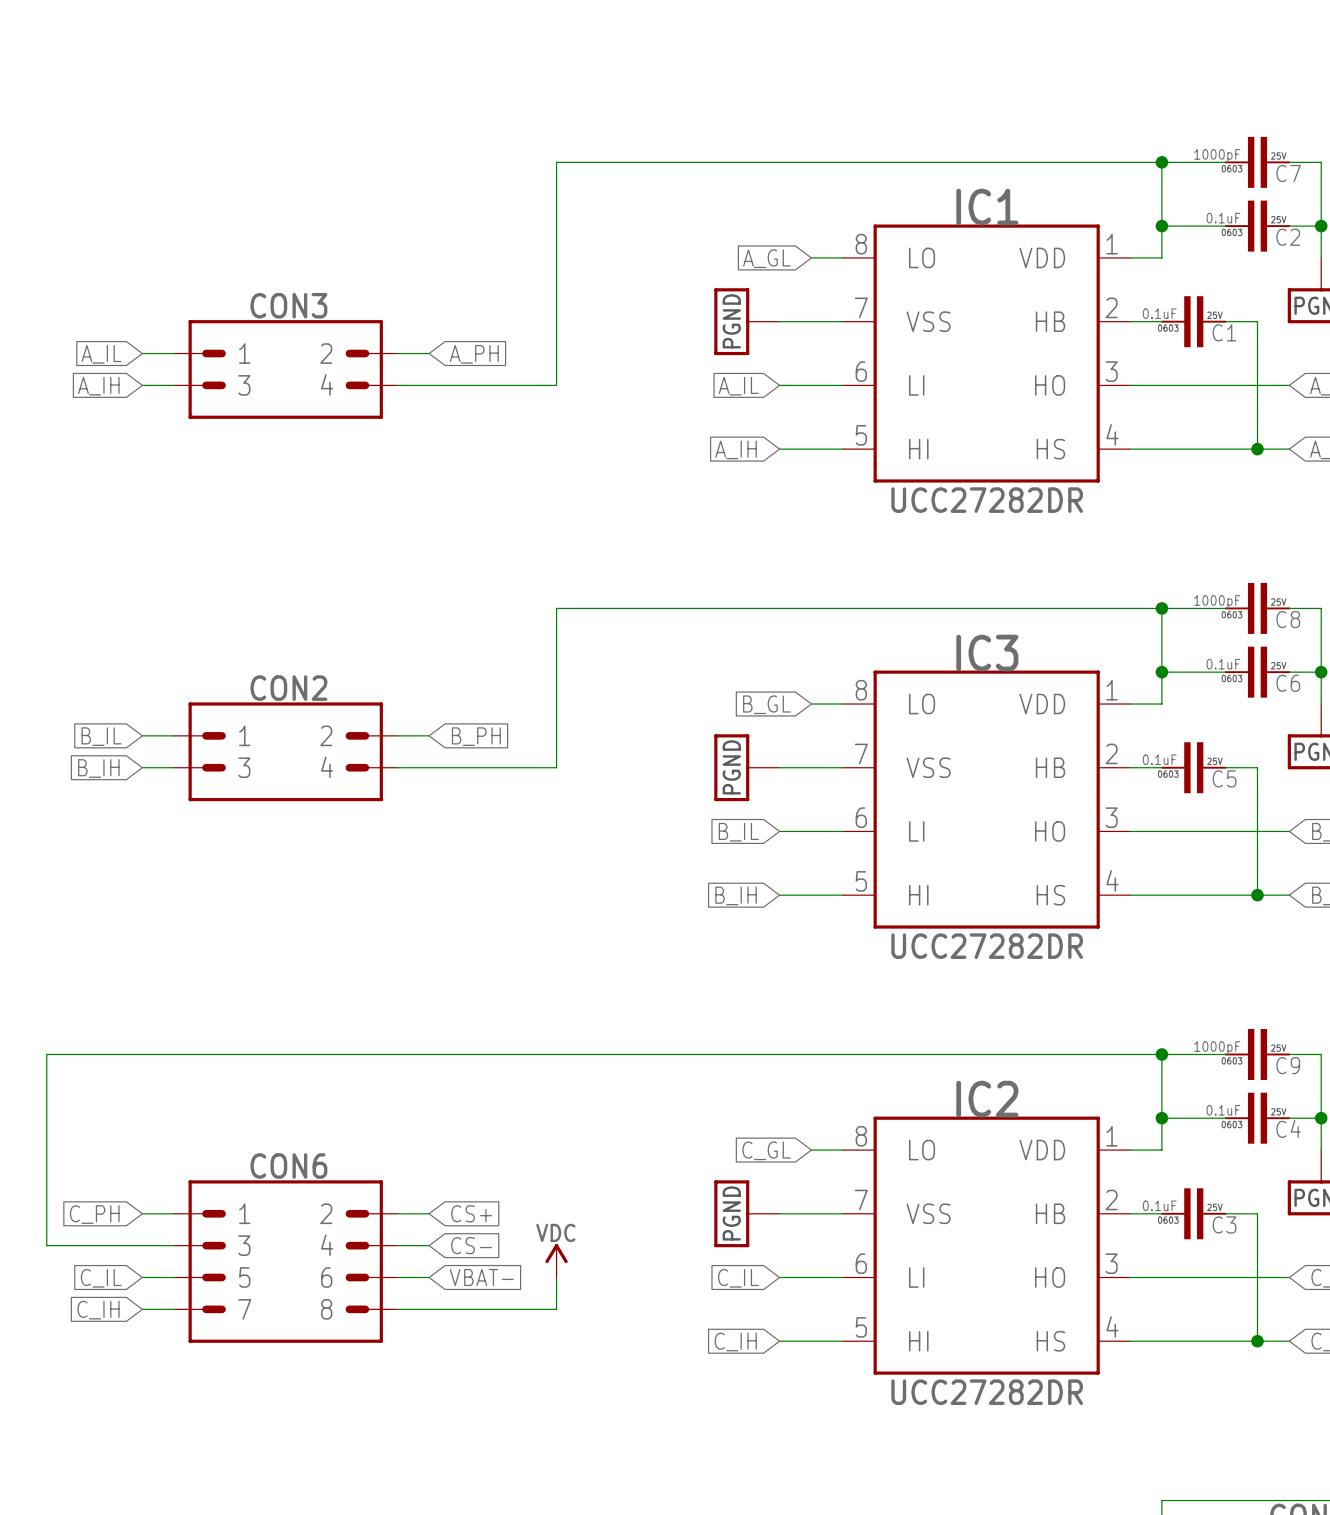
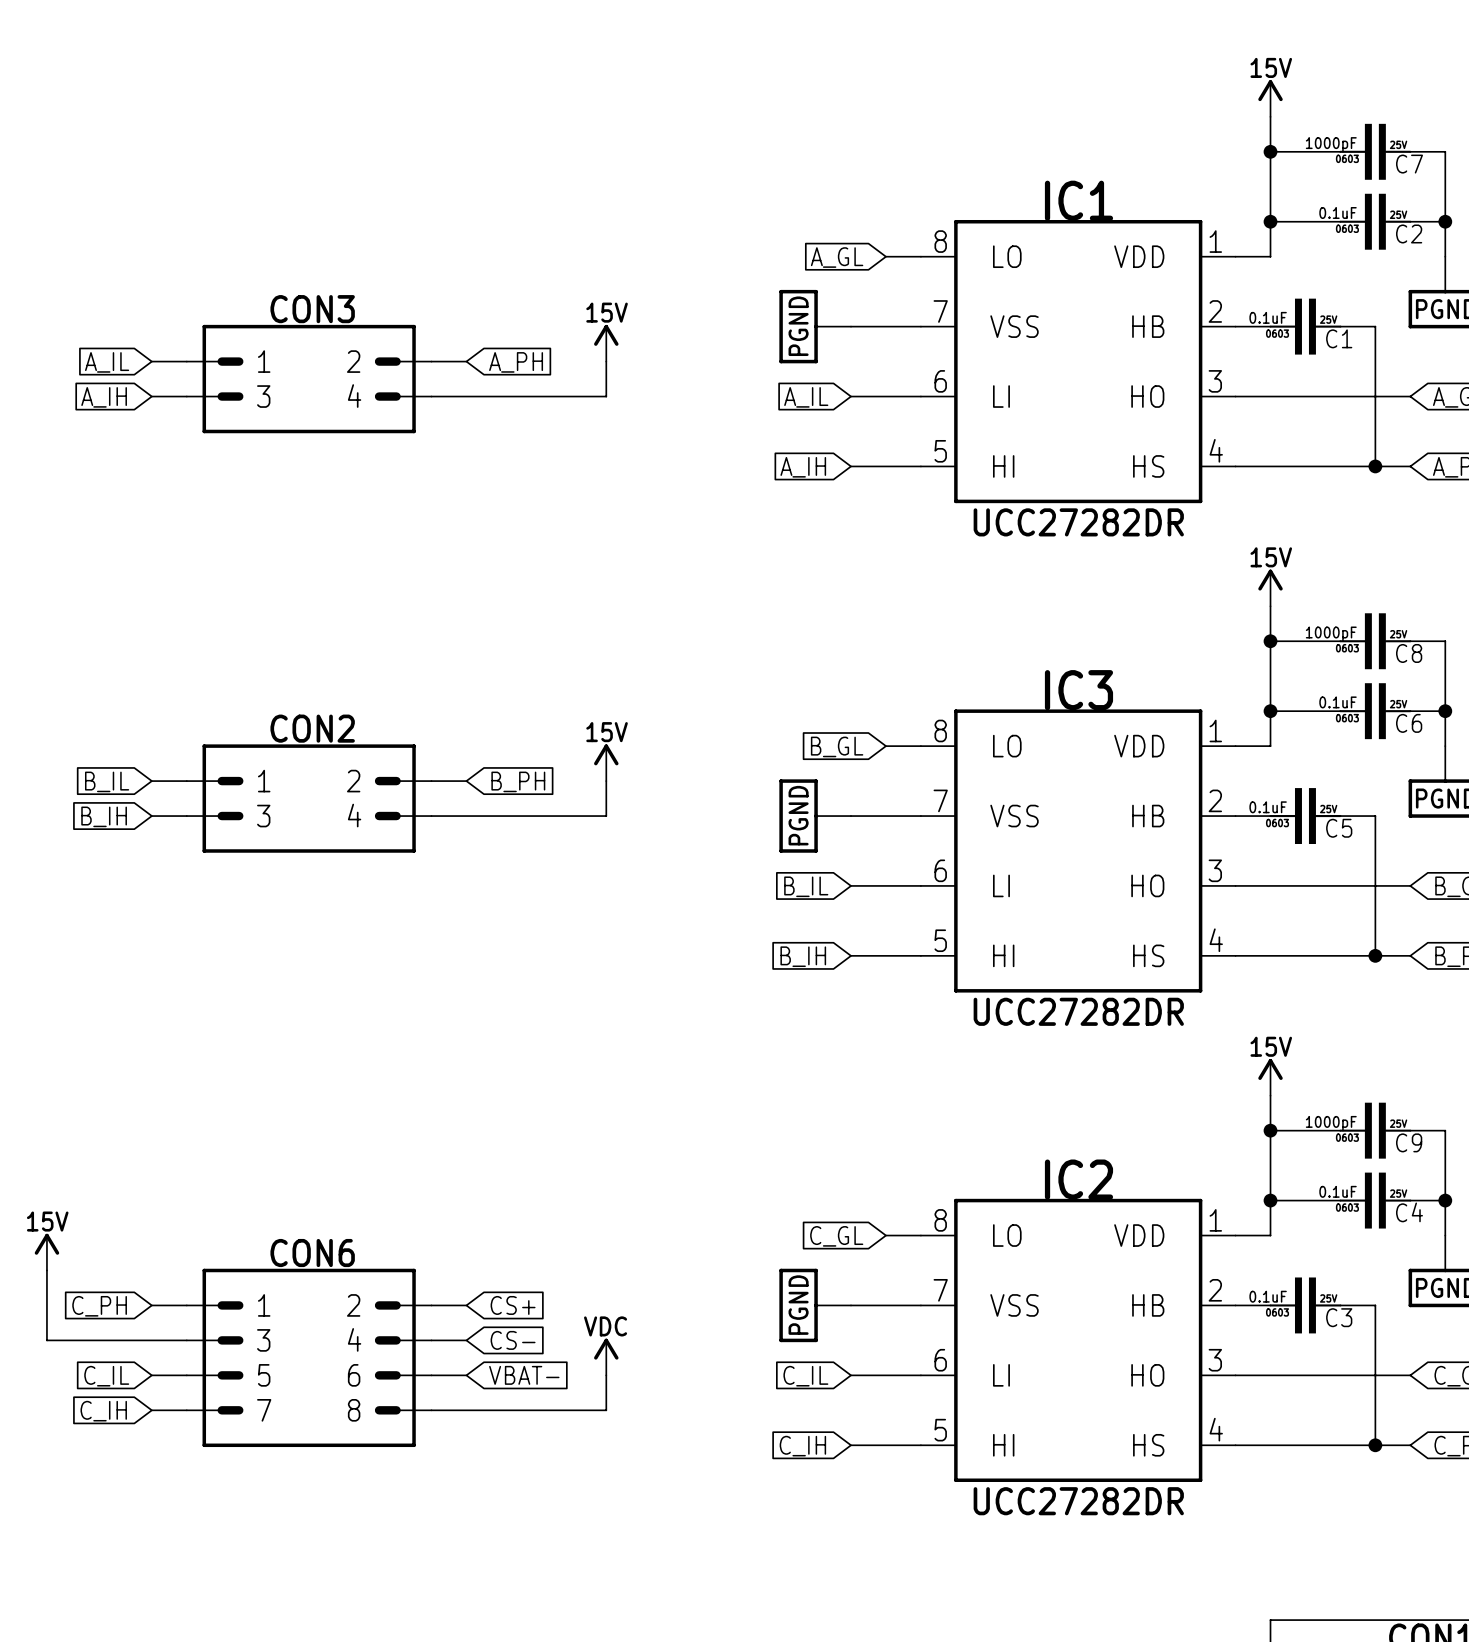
power symbol: none -> 15V (1270, 98)
wire: (1161, 162) (556, 162) (556, 353) -> (1270, 151) (1270, 116)
power symbol: none -> 15V (606, 343)
power symbol: none -> 15V (1270, 587)
wire: (1161, 608) (556, 608) (556, 735) -> (1270, 641) (1270, 606)
power symbol: none -> 15V (606, 762)
power symbol: none -> 15V (1270, 1077)
wire: (1161, 1054) (46, 1054) (46, 1181) -> (1270, 1130) (1270, 1095)
power symbol: none -> 15V (46, 1252)

